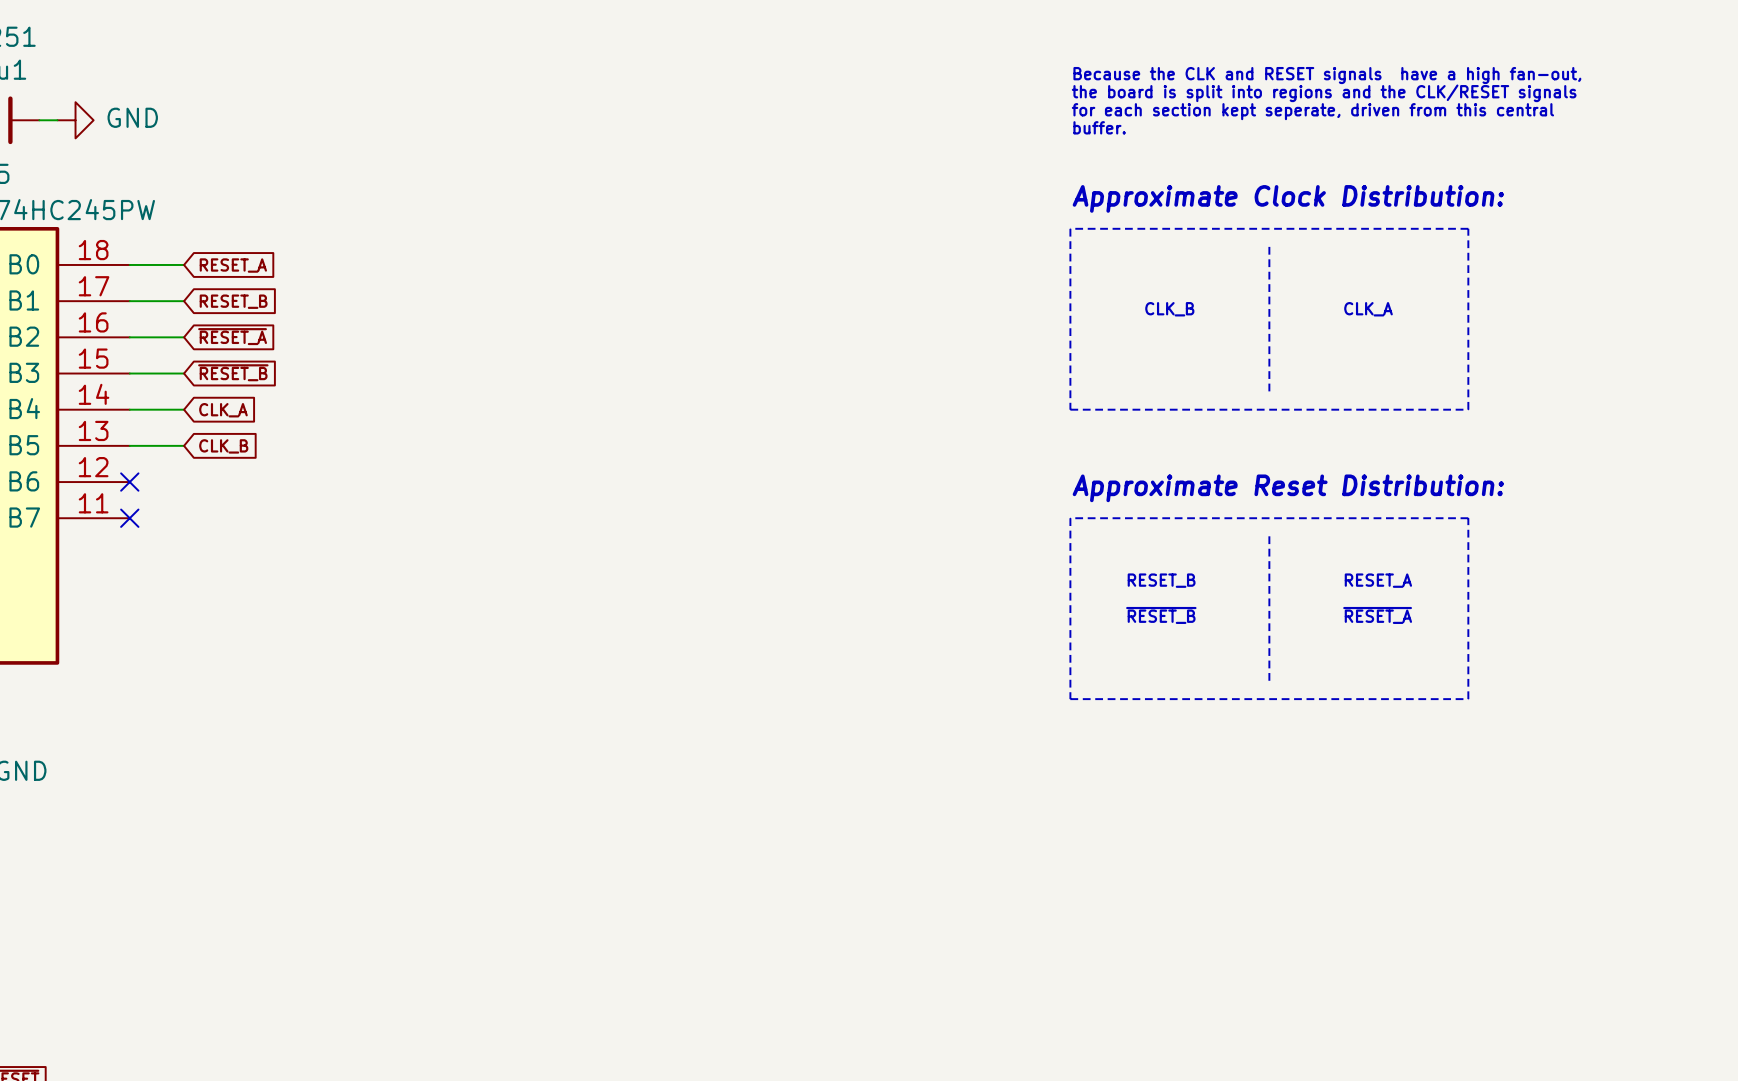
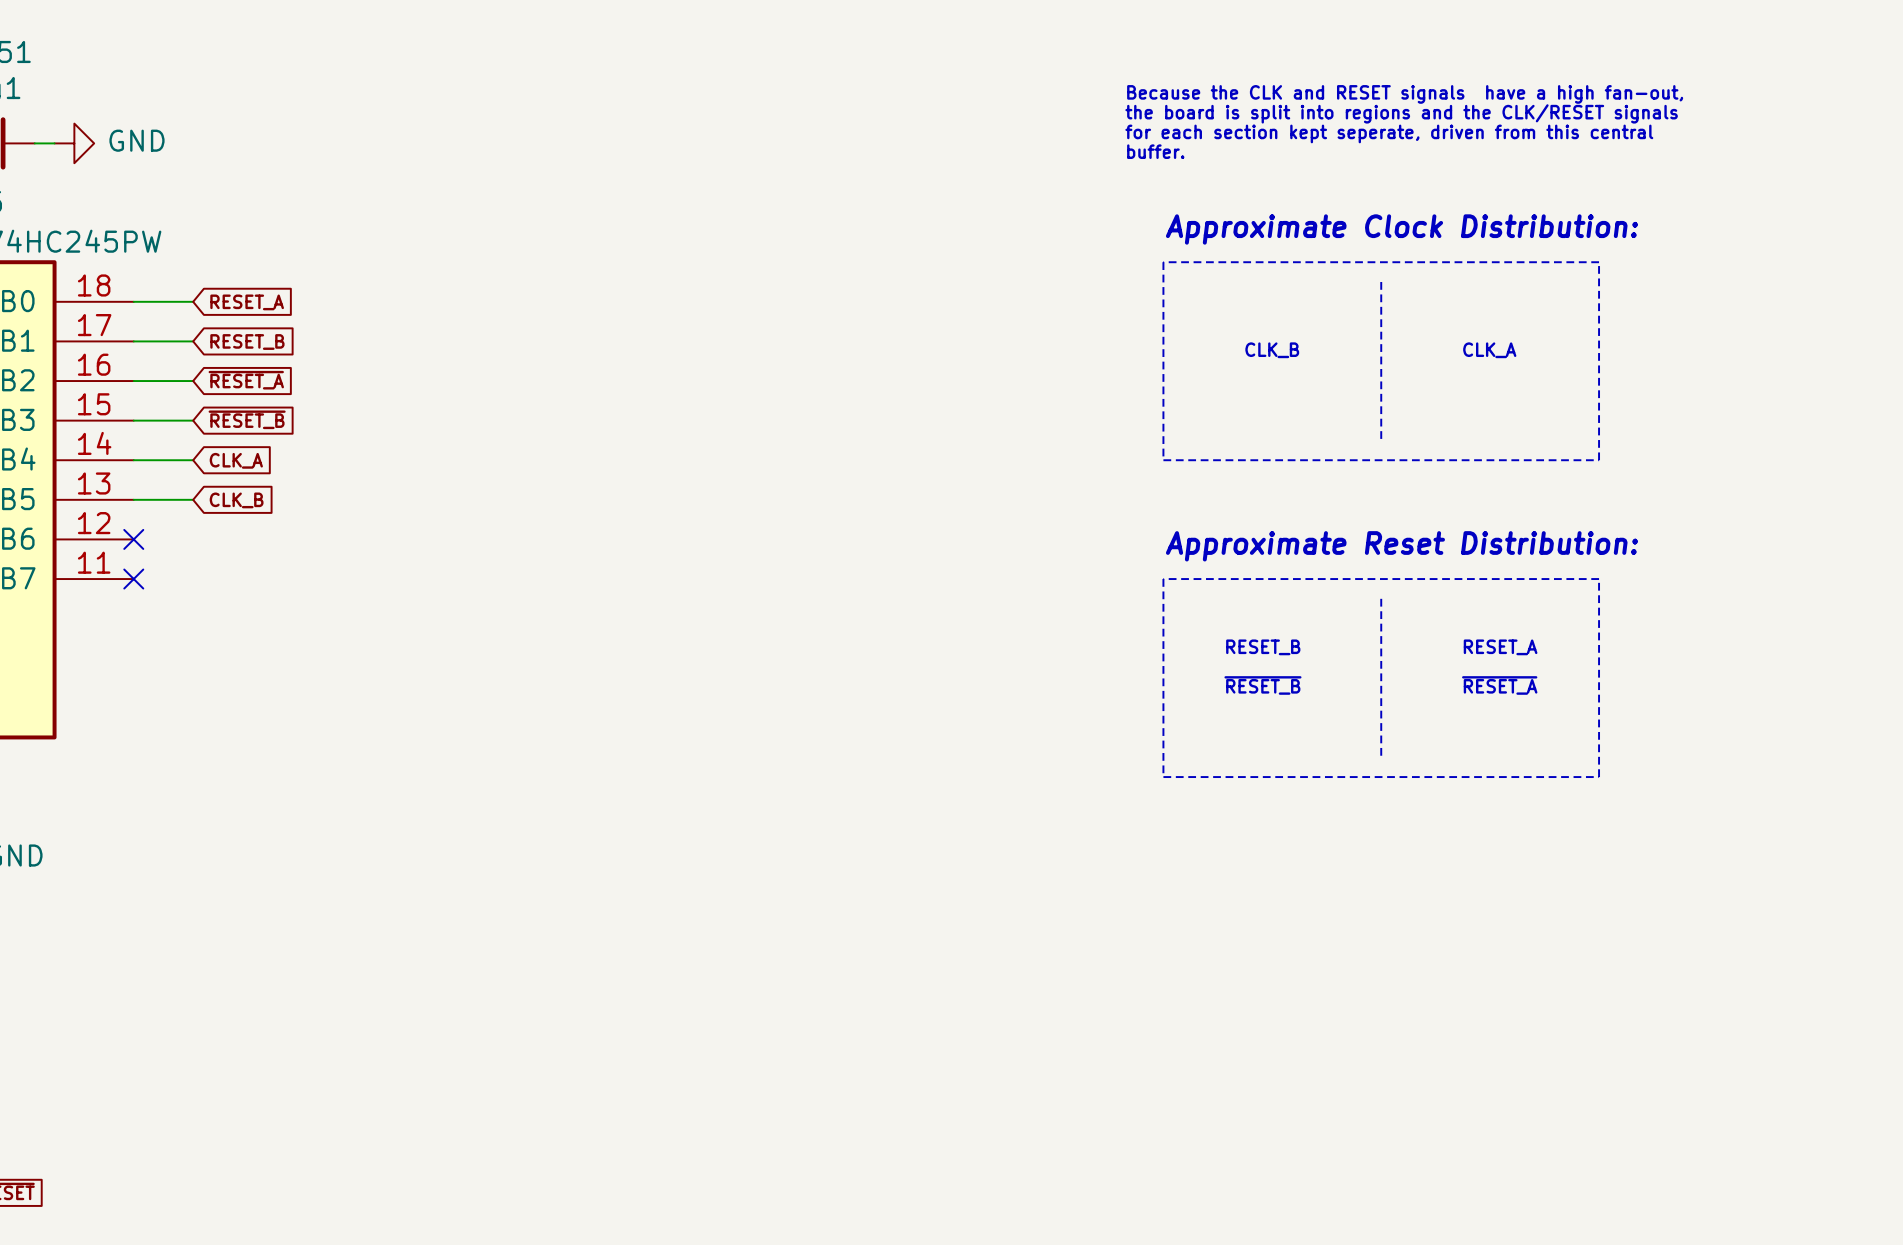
text position: Because the CLK and RESET signals have a high fan-out, (1327, 75) -> Because the CLK and RESET signals have a high fan-out, (1405, 94)
text position: the board is split into regions and the CLK/RESET signals (1324, 93) -> the board is split into regions and the CLK/RESET signals (1401, 113)
text position: for each section kept seperate, driven from this central (1312, 111) -> for each section kept seperate, driven from this central (1389, 133)
text position: buffer. (1099, 127) -> buffer. (1155, 151)

